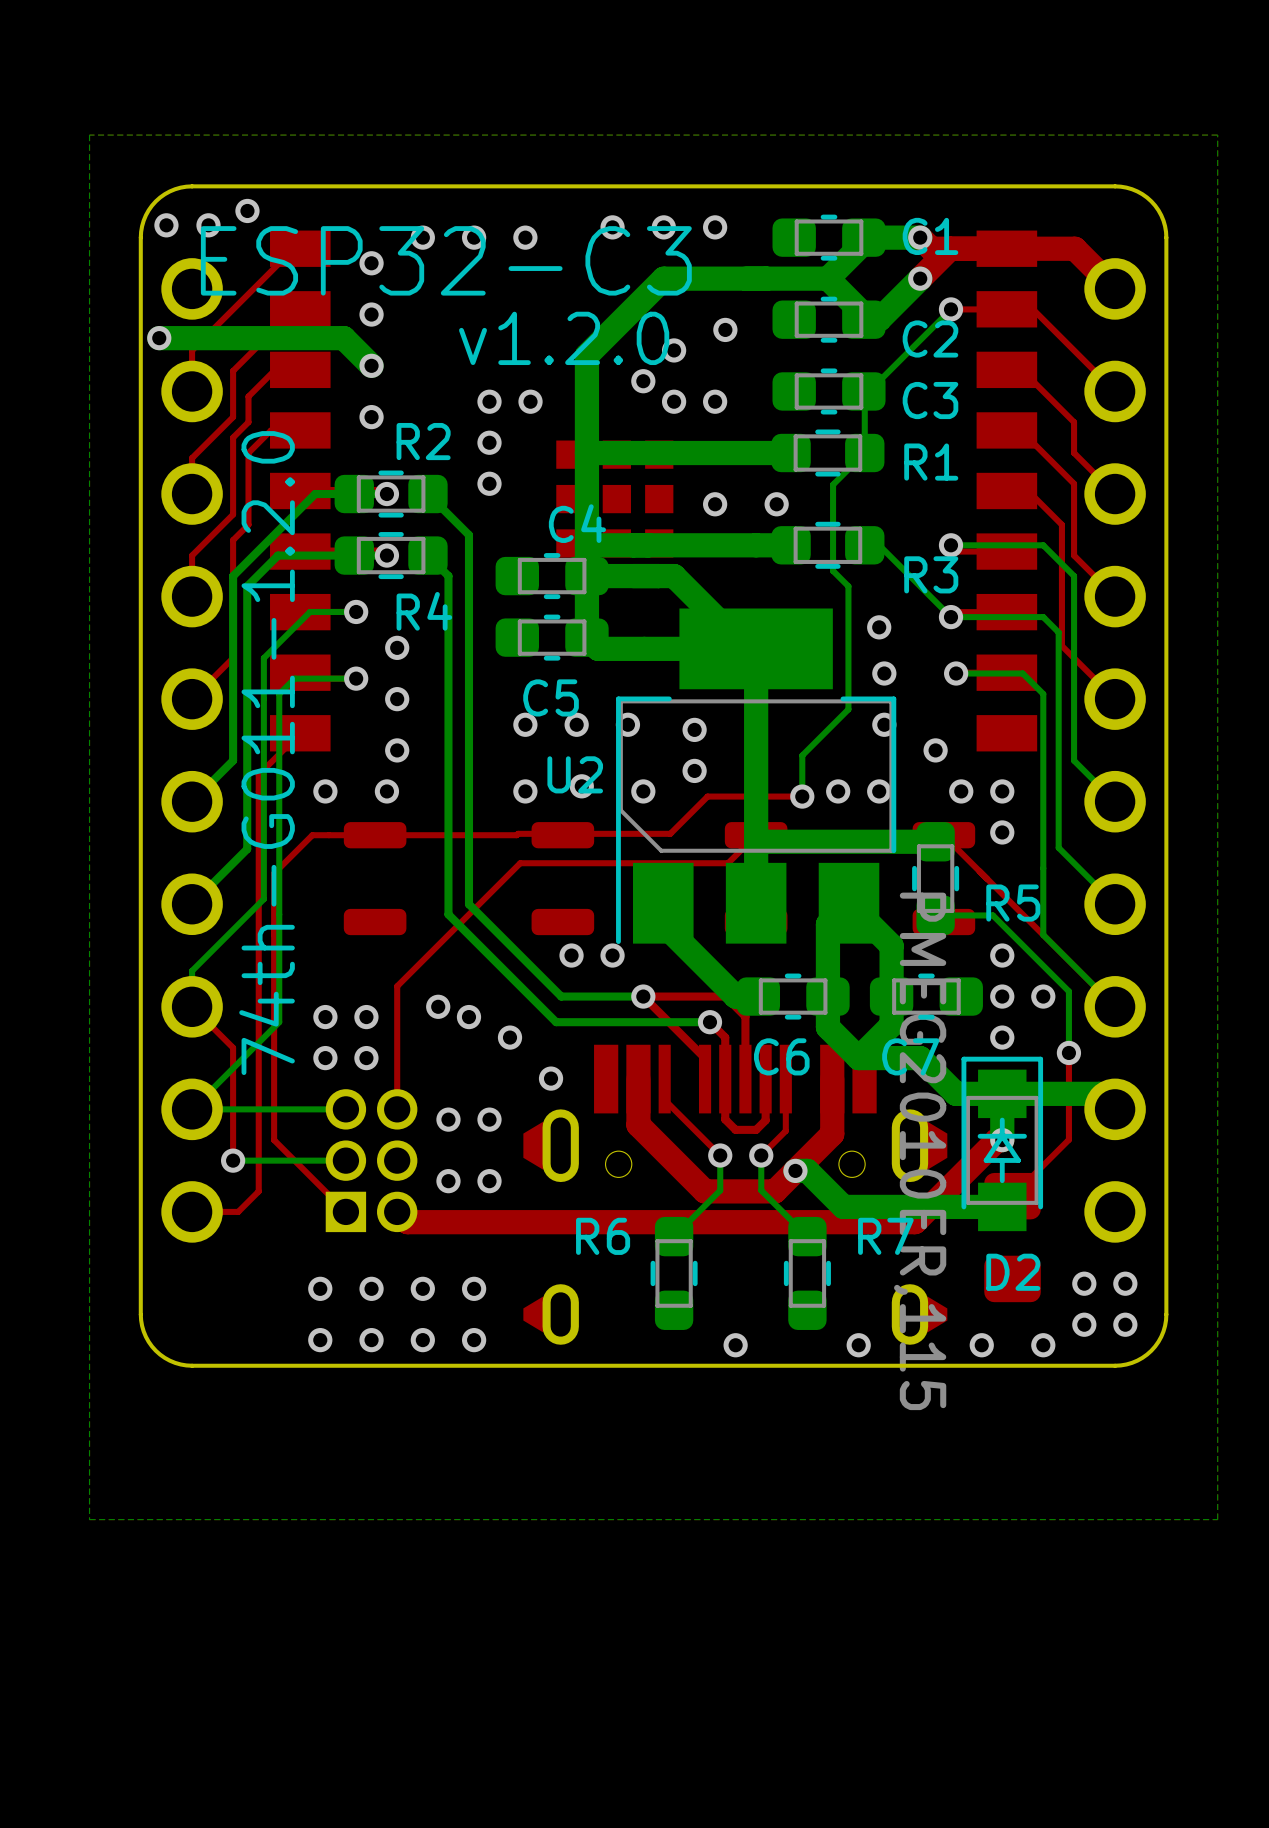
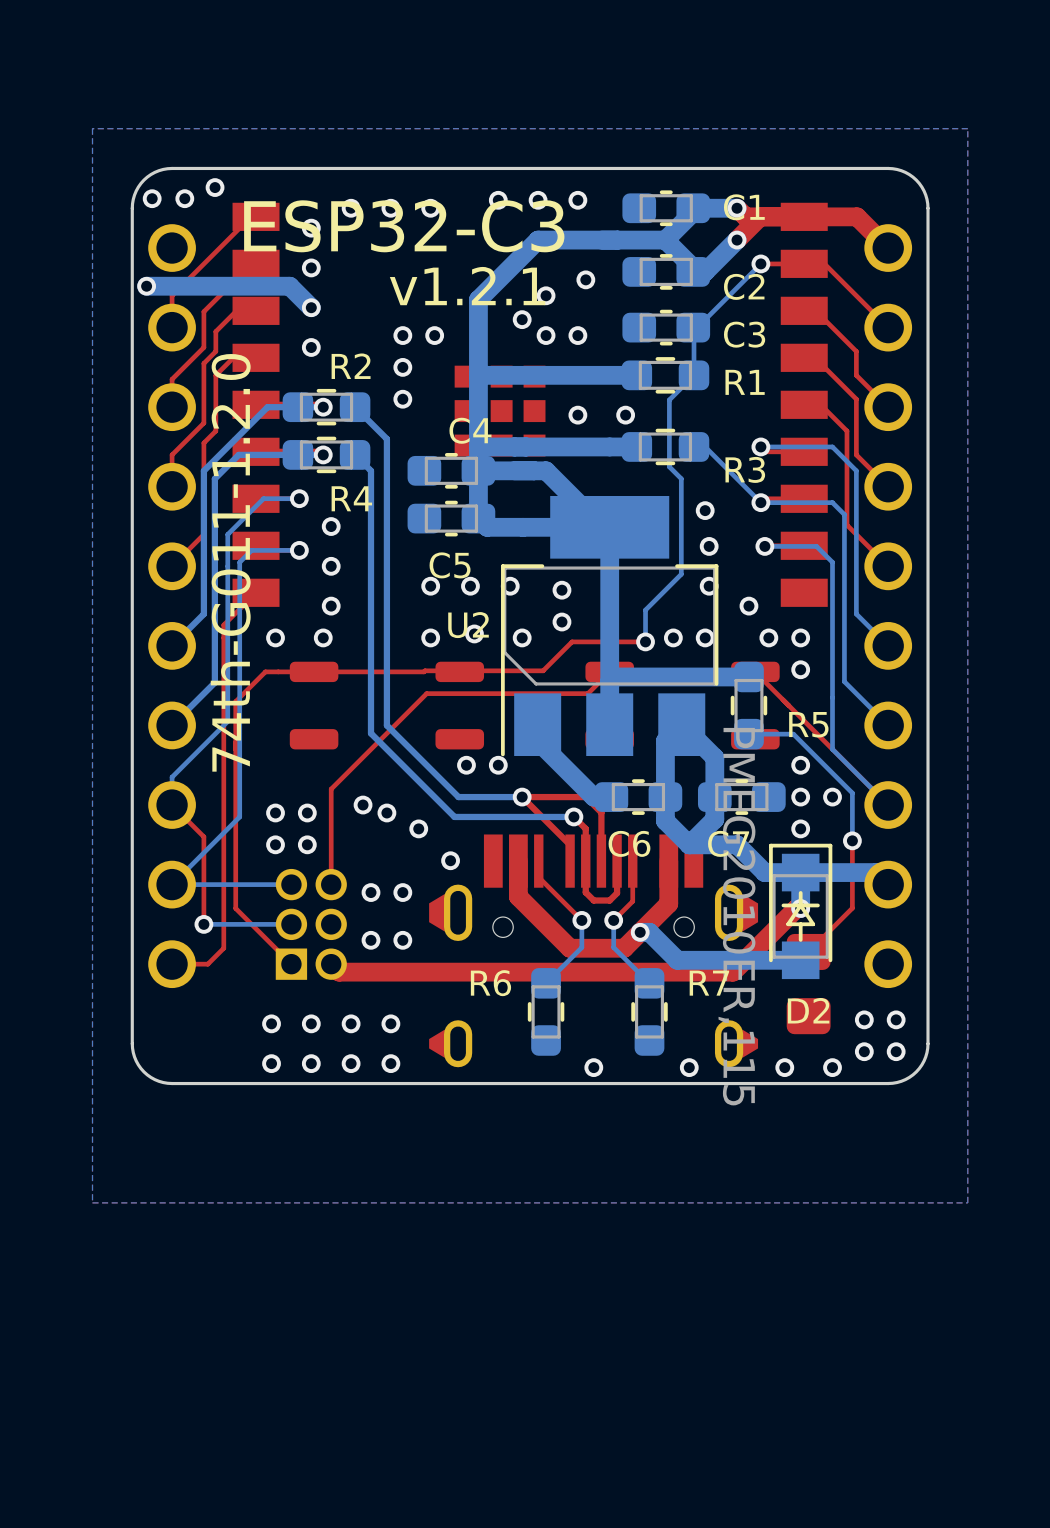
text: v1.2.0 (564, 338) -> v1.2.1 (467, 286)

